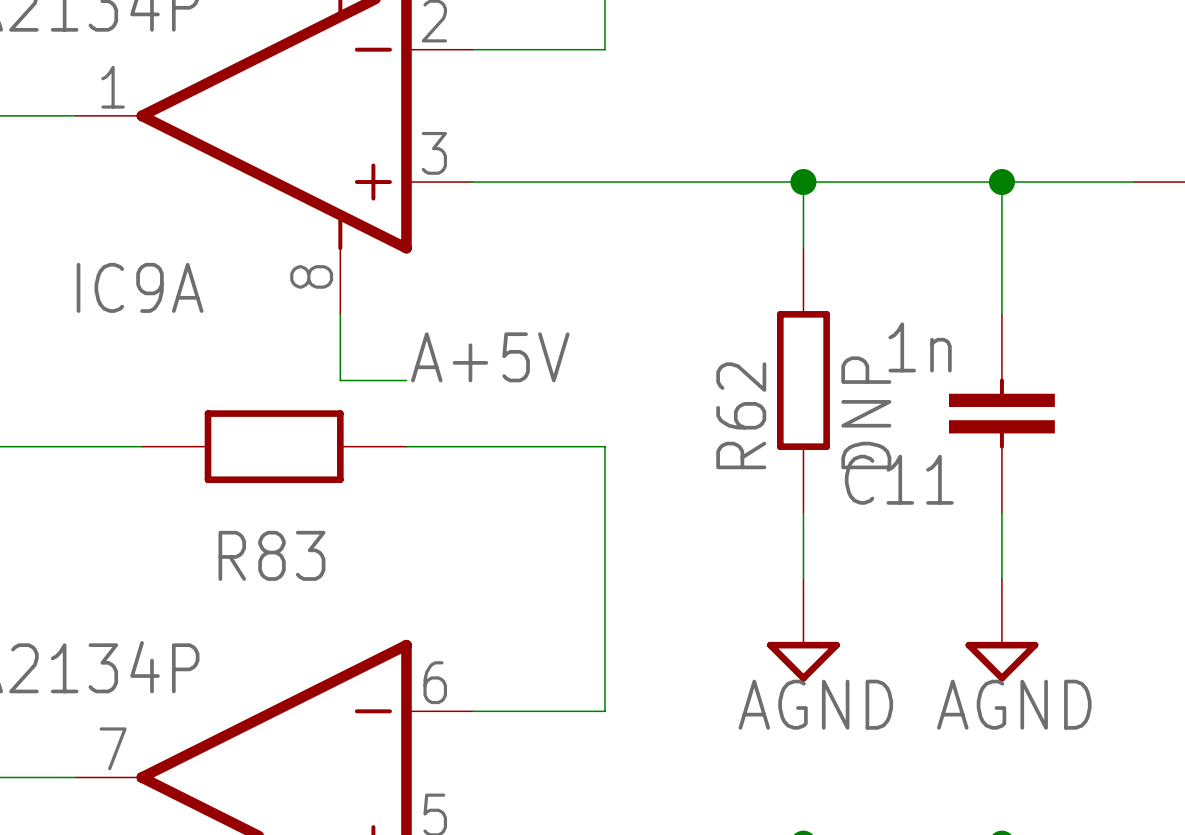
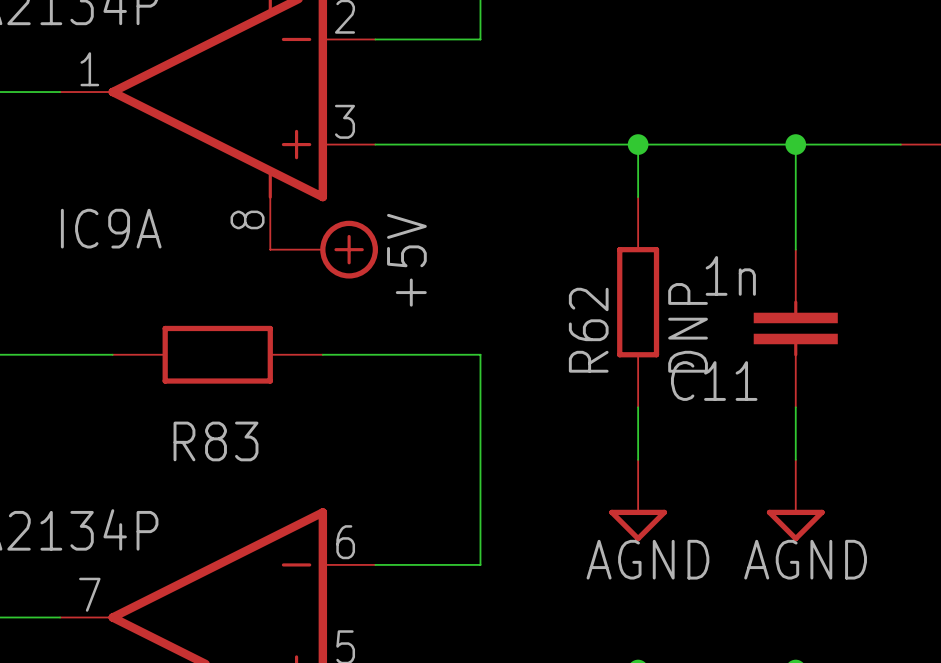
wire: (340, 314) (340, 380) (406, 380) -> none
power symbol: none -> +5V (324, 249)
label: A+5V (490, 357) -> none

